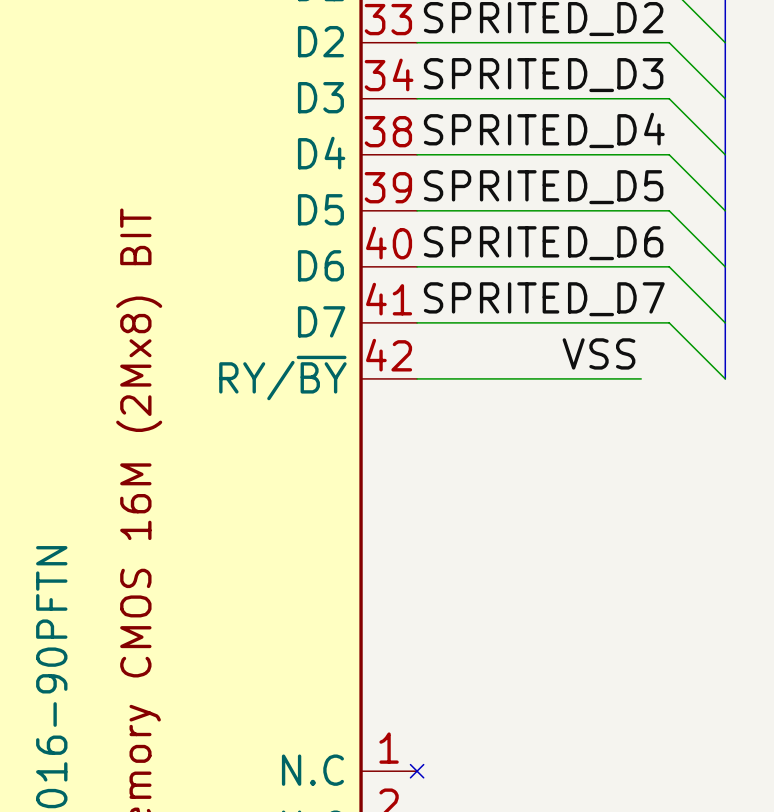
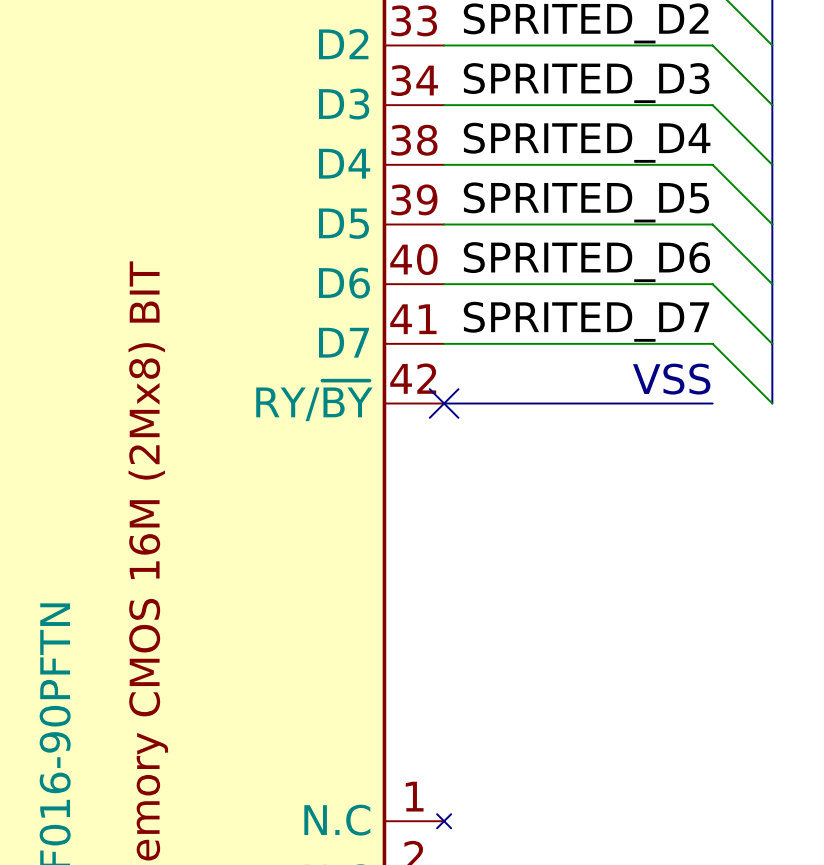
label: VSS (598, 353) -> none
text: none -> VSS (671, 379)
line: none -> (444, 403) (712, 403)
no-connect mark: none -> (444, 403)

